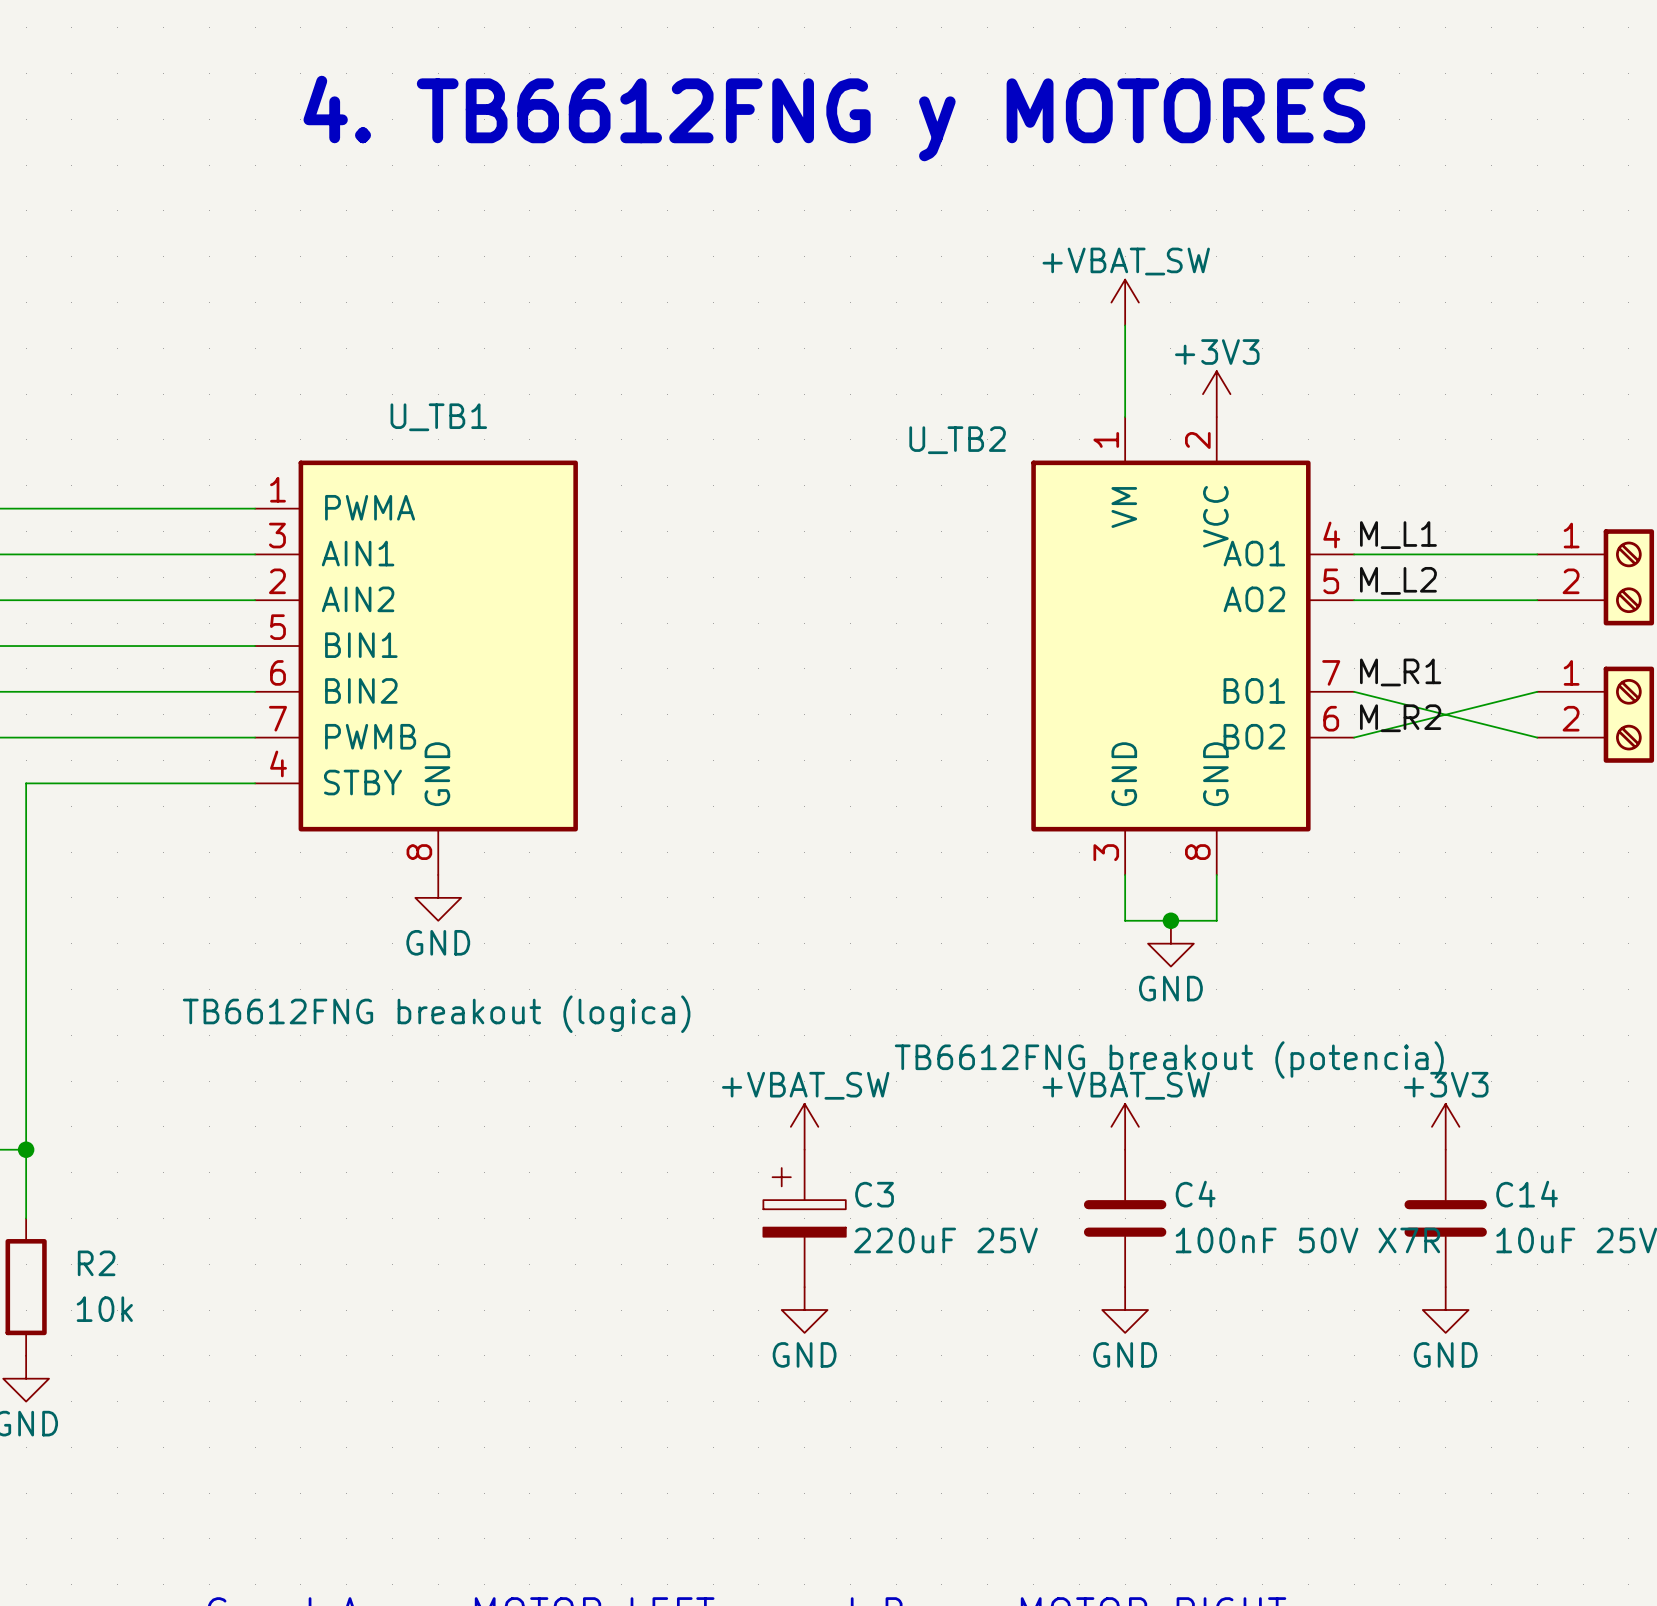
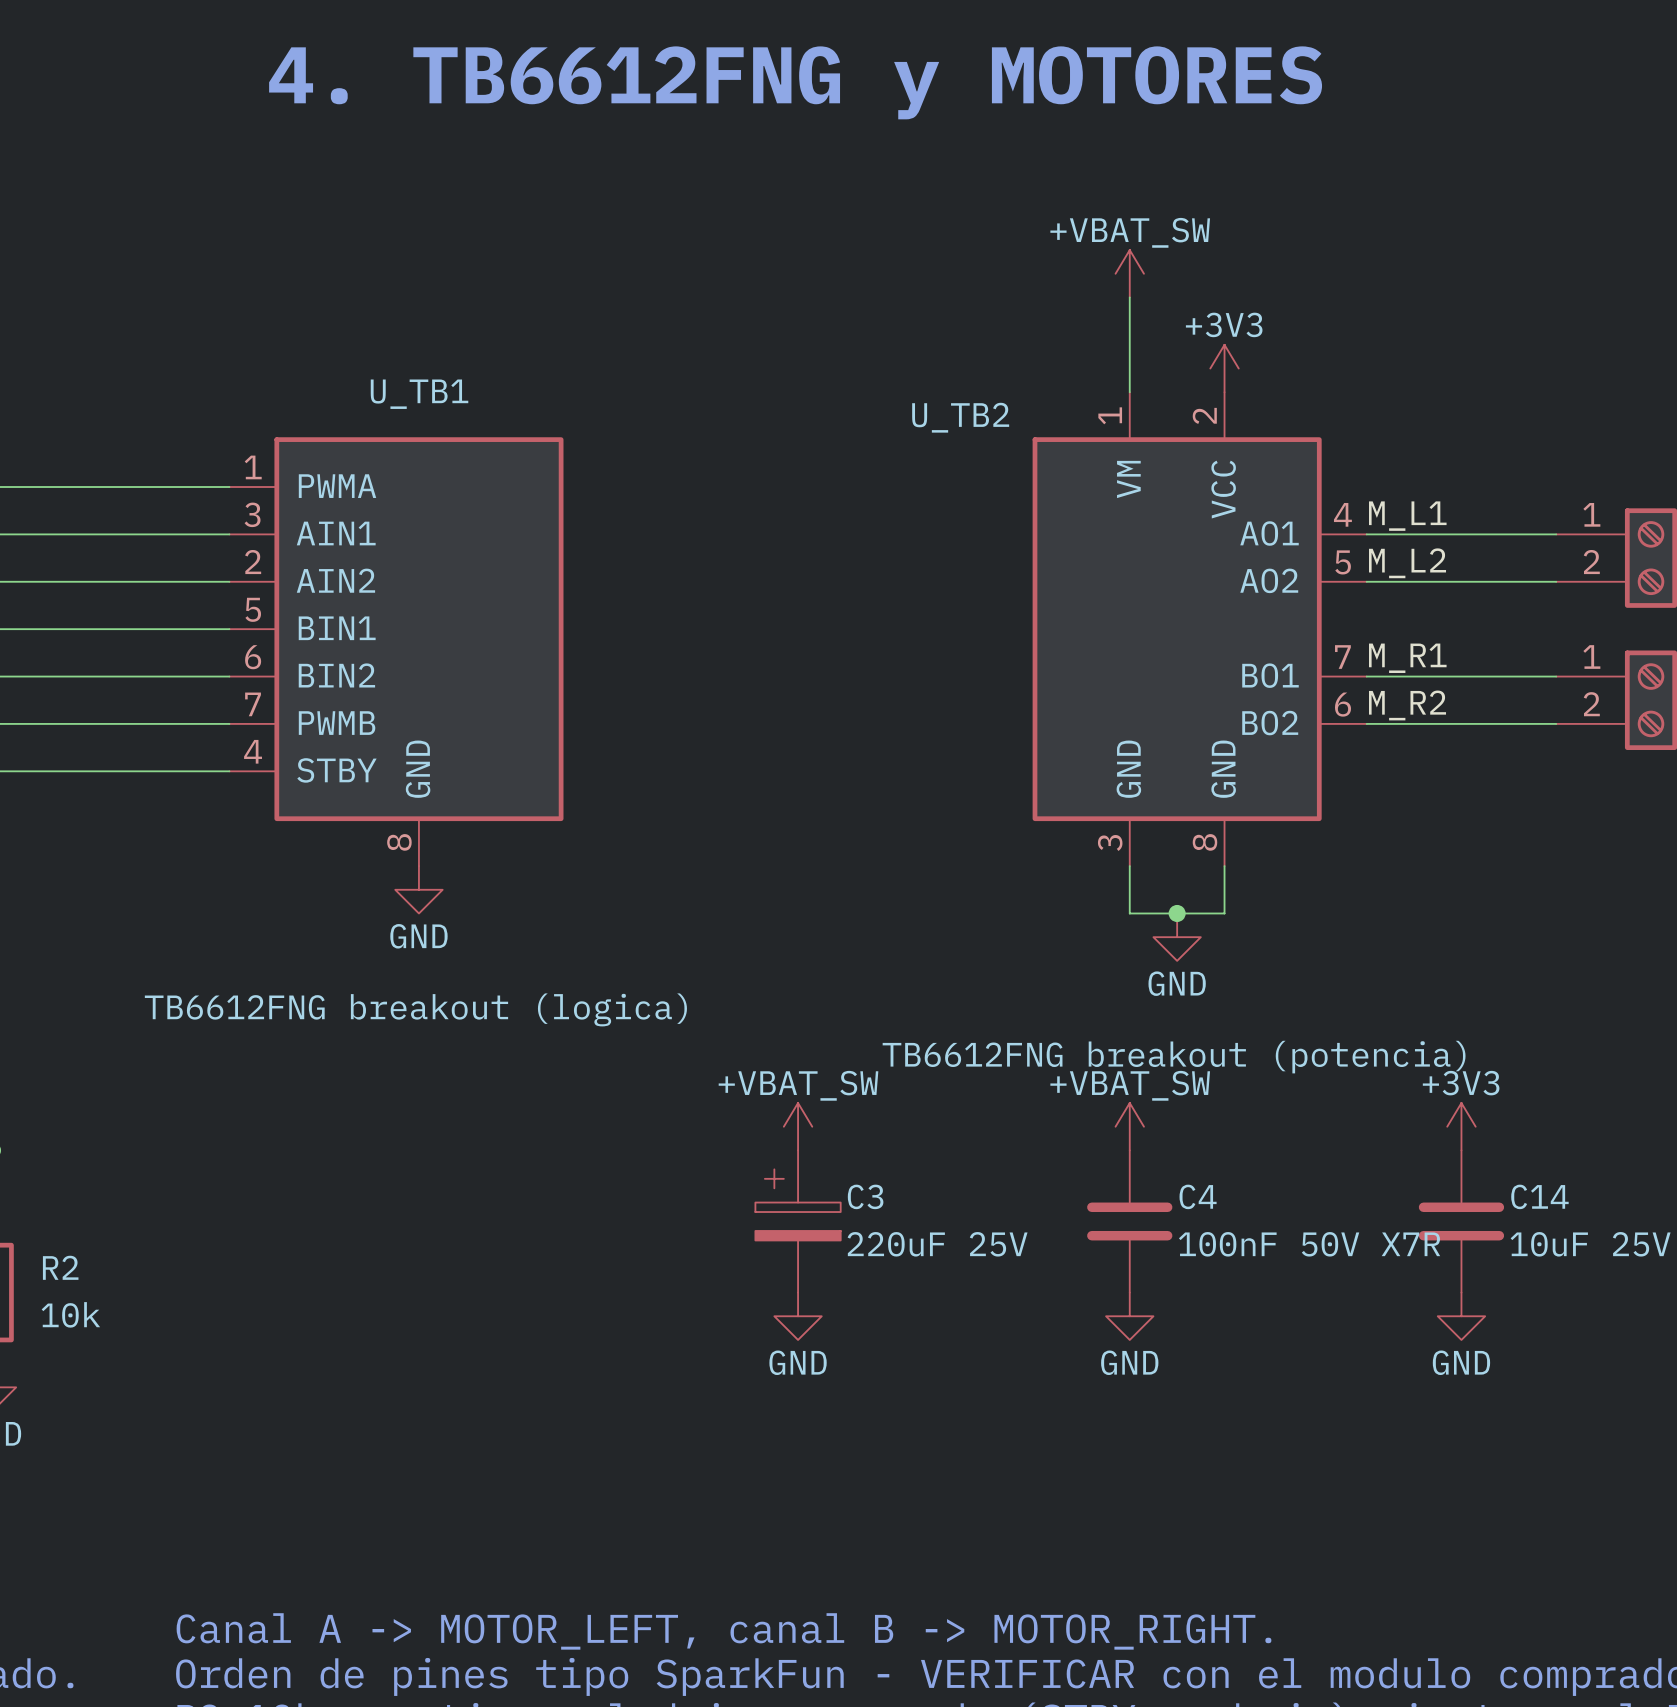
wire: (1354, 691) (1537, 737) -> (1366, 723) (1556, 723)
wire: (1537, 691) (1354, 737) -> (1556, 676) (1366, 676)

